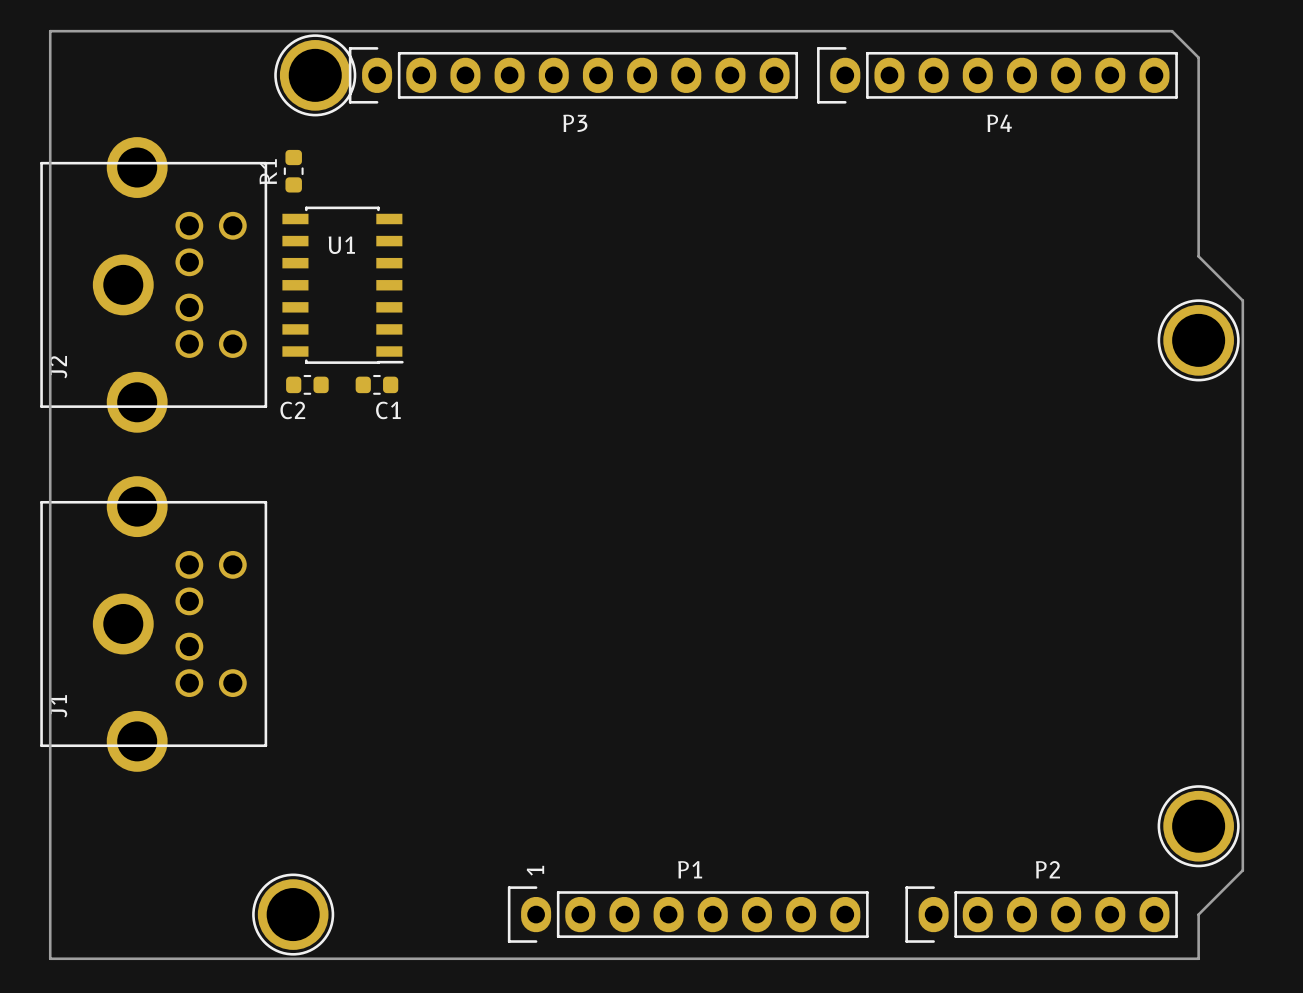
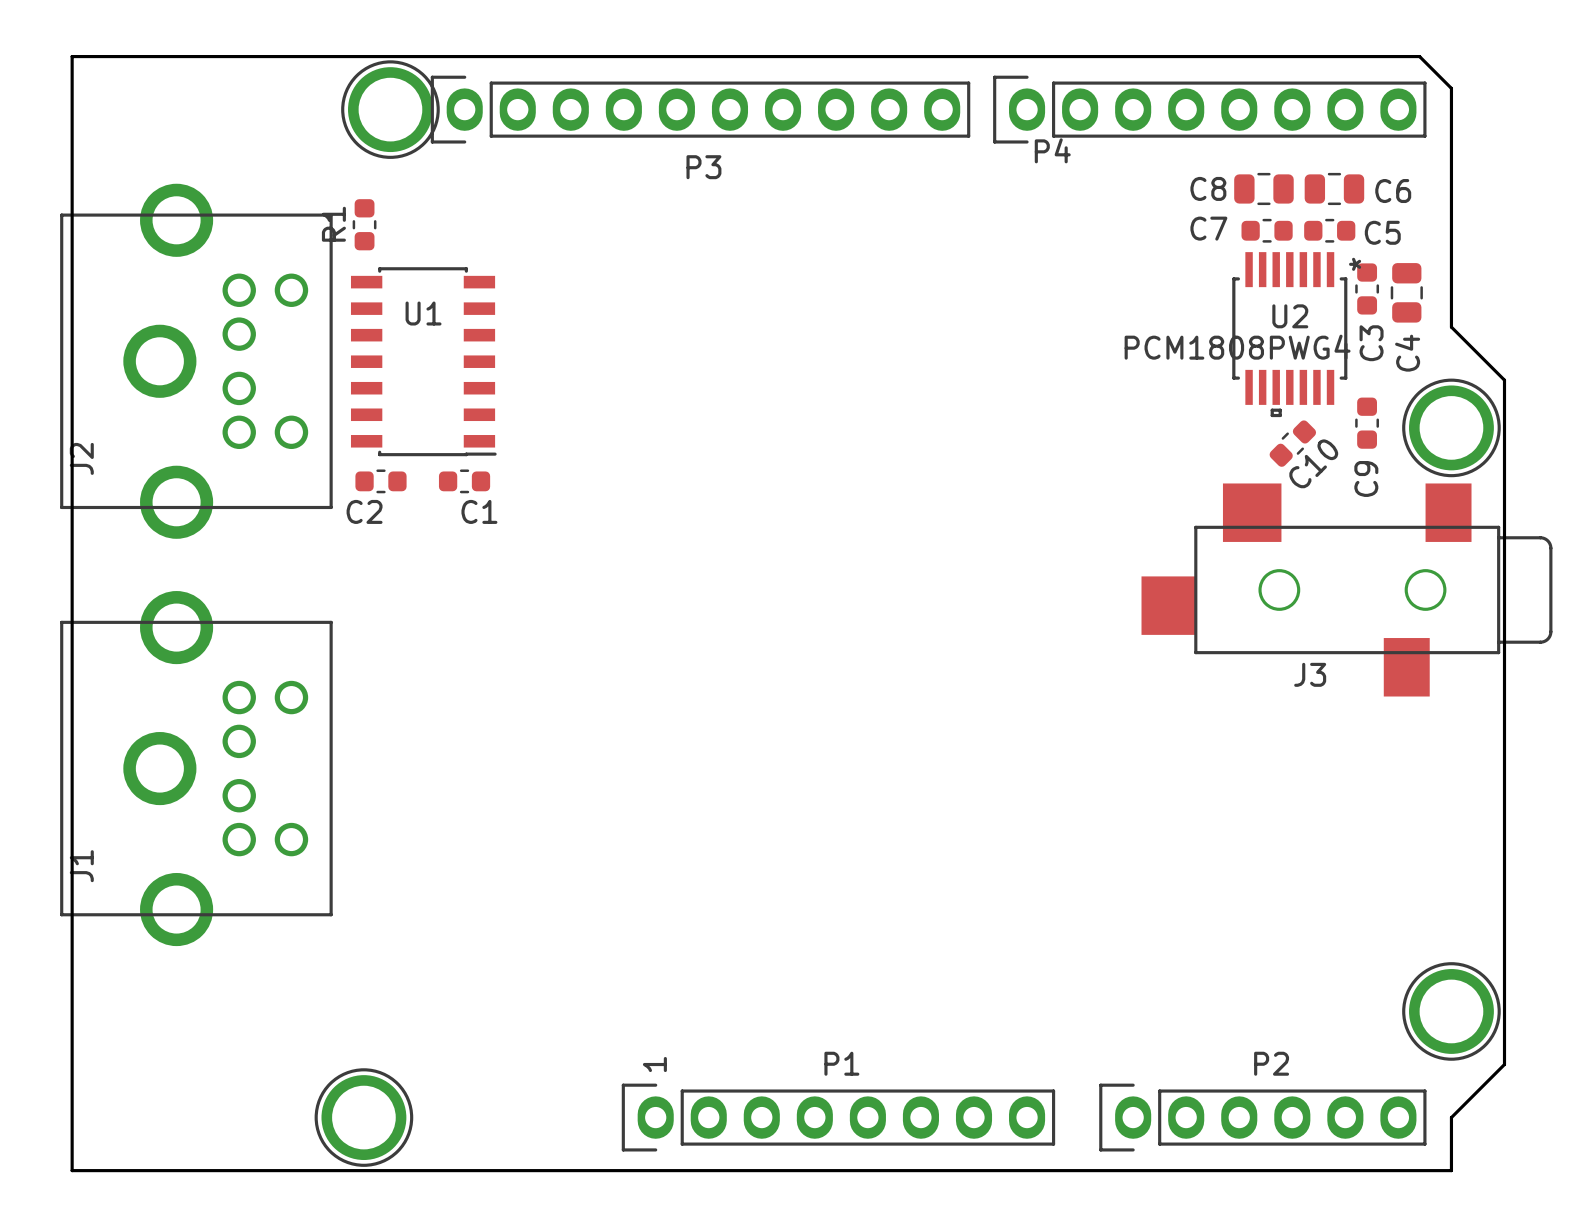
P4 name position: P4 (999, 123) -> P4 (1052, 150)
C8: none -> (1263, 188)
C6: none -> (1334, 188)
C7: none -> (1267, 230)
C5: none -> (1329, 230)
C3: none -> (1367, 288)
C4: none -> (1406, 292)
U2: none -> PCM1808PWG4 (1289, 334)
C9: none -> (1367, 423)
C10: none -> (1292, 443)
J3: none -> (1346, 589)

